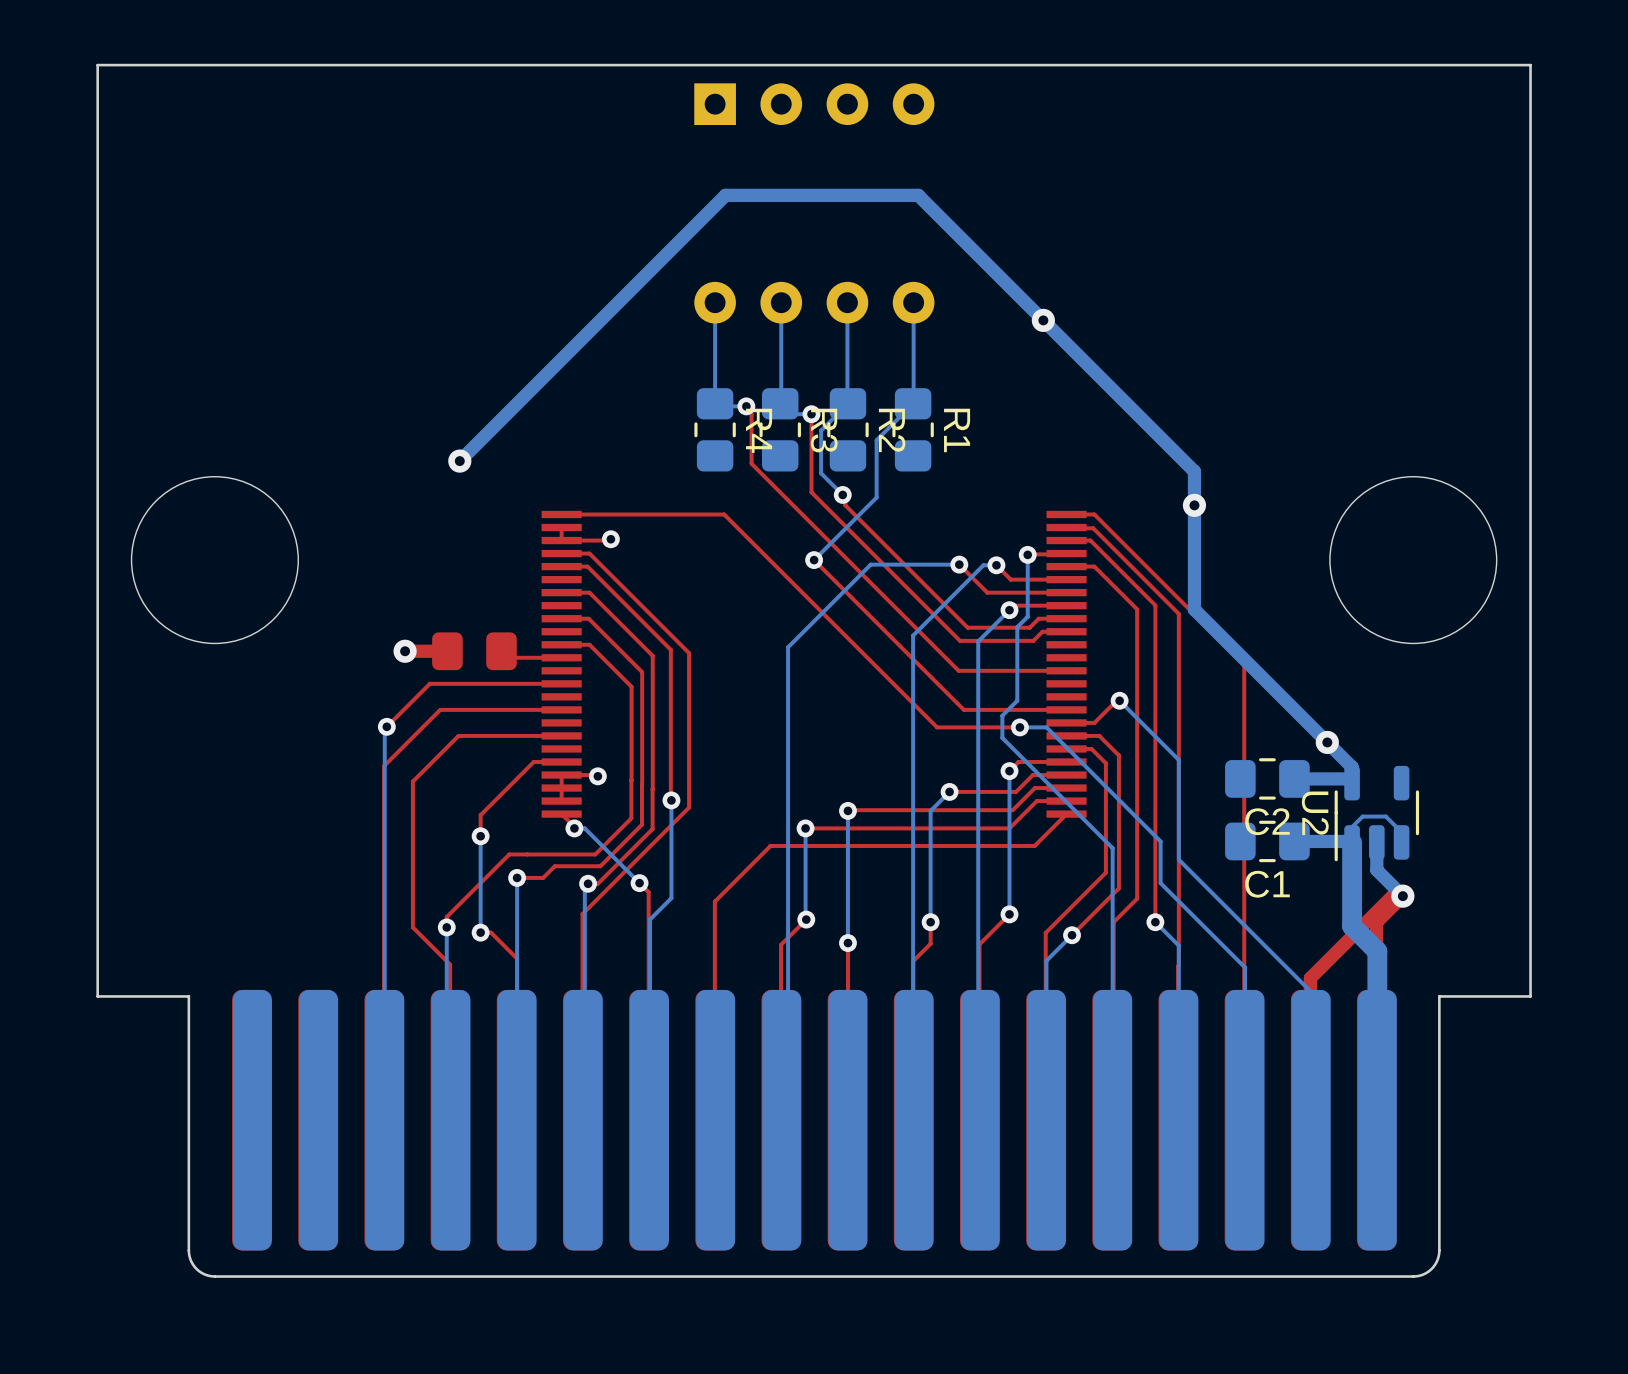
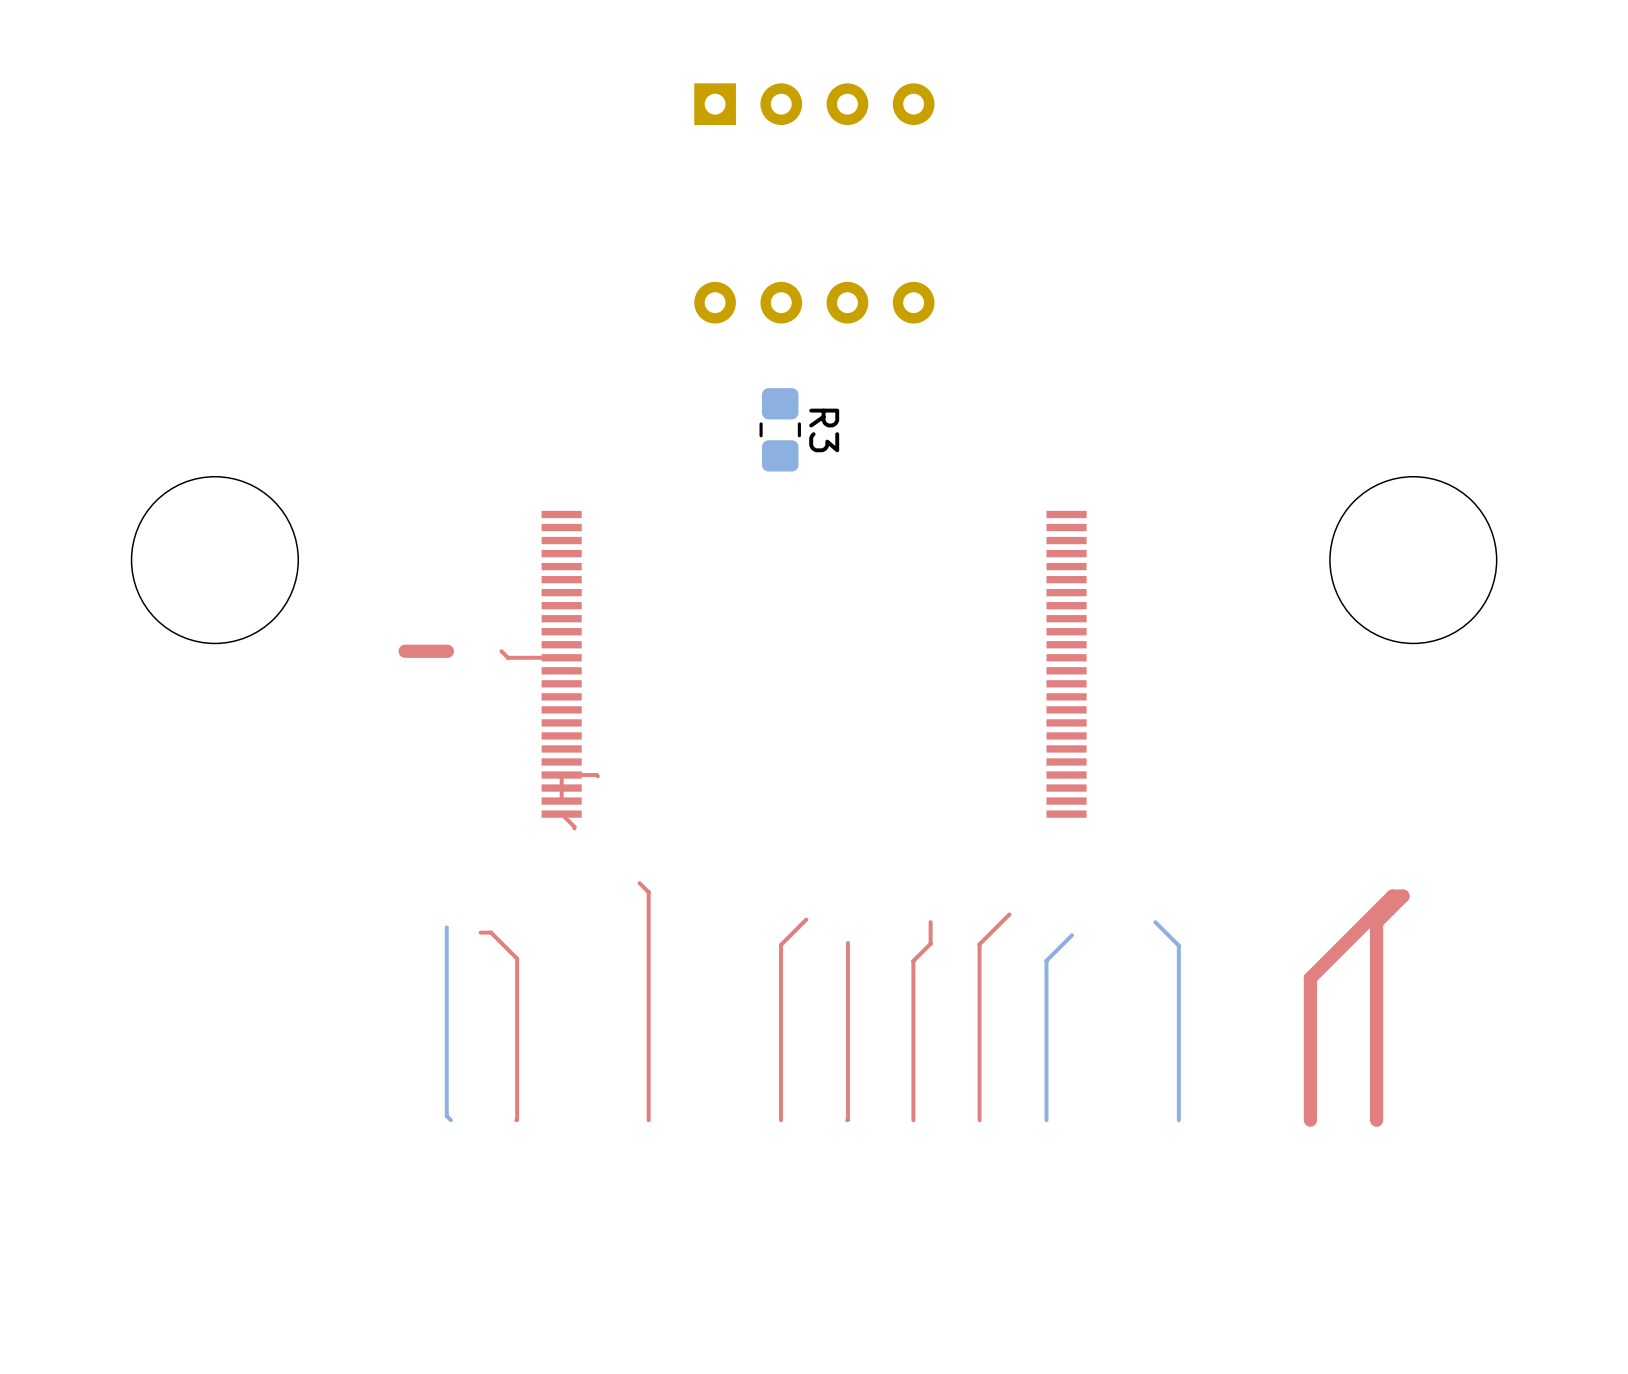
board edge: (1530, 65) (1530, 996) (1439, 996) (1439, 1250) (1436, 1261) (1431, 1268) (1421, 1275) (1413, 1276) (214, 1276) (206, 1275) (196, 1268) (191, 1261) (188, 1250) (188, 996) (97, 996) (97, 65) (1530, 65) -> none
bottom track: (715, 302) (715, 403) (717, 406) (746, 406) -> none
bottom track: (781, 302) (780, 403) (790, 414) (811, 414) -> none
bottom track: (847, 302) (847, 403) (821, 430) (821, 473) (842, 494) -> none
bottom track: (913, 302) (913, 403) (876, 440) (876, 497) (814, 560) -> none
via: (1043, 320) -> none
top track: (746, 406) (751, 414) (751, 463) (958, 670) (1066, 670) -> none
via: (746, 406) -> none
top track: (811, 414) (811, 492) (960, 640) (1033, 640) (1042, 631) (1066, 631) -> none
via: (811, 414) -> none
R4: (715, 429) -> none
R2: (847, 429) -> none
R1: (913, 429) -> none
bottom track: (459, 461) (725, 195) (918, 195) (1194, 471) (1194, 609) (1352, 767) (1352, 783) (1347, 778) (1294, 778) -> none
via: (459, 461) -> none
top track: (842, 494) (845, 497) (845, 505) (967, 627) (1029, 627) (1038, 618) (1066, 618) -> none
via: (842, 494) -> none
via: (1194, 505) -> none
top track: (561, 514) (724, 514) (937, 727) (1019, 727) -> none
top track: (1066, 514) (1094, 514) (1244, 664) (1244, 1120) -> none
top track: (561, 527) (561, 540) (610, 539) -> none
top track: (1066, 527) (1093, 528) (1178, 613) (1178, 1120) -> none
via: (610, 539) -> none
top track: (1066, 540) (1090, 540) (1155, 605) (1155, 922) -> none
top track: (561, 553) (589, 553) (689, 653) (689, 807) (582, 914) (582, 1120) -> none
bottom track: (1027, 554) (1027, 616) (1017, 627) (1017, 700) (1002, 715) (1002, 737) (1112, 848) (1112, 1120) -> none
via: (1027, 554) -> none
top track: (1045, 554) (1027, 554) -> none
top track: (814, 560) (963, 709) (1066, 709) -> none
via: (814, 560) -> none
top track: (959, 564) (987, 592) (1066, 592) -> none
bottom track: (959, 564) (870, 564) (788, 647) (788, 1113) (781, 1120) -> none
via: (959, 564) -> none
top track: (996, 565) (1010, 579) (1066, 579) -> none
bottom track: (996, 565) (983, 565) (913, 635) (914, 1120) -> none
via: (996, 565) -> none
top track: (561, 566) (587, 566) (670, 649) (671, 800) -> none
top track: (1066, 566) (1094, 566) (1137, 609) (1137, 898) (1113, 922) (1113, 1118) (1111, 1120) -> none
top track: (561, 592) (589, 592) (652, 655) (652, 789) -> none
top track: (1066, 605) (1013, 605) (1009, 610) -> none
bottom track: (1009, 610) (978, 641) (978, 1118) (980, 1120) -> none
via: (1009, 610) -> none
top track: (561, 618) (588, 618) (642, 672) (642, 784) -> none
top track: (561, 644) (589, 644) (631, 686) (631, 818) (595, 854) (509, 854) (446, 917) (446, 927) -> none
via: (405, 651) -> none
part: (474, 651) -> none
top track: (561, 683) (429, 683) (386, 726) -> none
top track: (1119, 700) (1116, 700) (1094, 722) (1066, 722) -> none
bottom track: (1119, 700) (1178, 759) (1178, 859) (1311, 992) (1311, 1120) -> none
via: (1119, 700) -> none
top track: (561, 709) (440, 709) (383, 766) (383, 1120) -> none
bottom track: (386, 726) (384, 728) (384, 1120) -> none
via: (386, 726) -> none
bottom track: (1019, 727) (1046, 727) (1160, 841) (1160, 883) (1245, 967) (1245, 1120) -> none
via: (1019, 727) -> none
top track: (561, 735) (458, 735) (412, 781) (412, 927) (450, 964) (450, 1120) -> none
top track: (1066, 735) (1099, 735) (1118, 755) (1118, 888) (1072, 935) -> none
via: (1327, 742) -> none
top track: (1066, 748) (1091, 748) (1105, 763) (1105, 872) (1045, 932) (1045, 1120) -> none
top track: (561, 761) (533, 761) (480, 815) (480, 836) -> none
top track: (1066, 761) (1018, 761) (1009, 771) -> none
bottom track: (1009, 771) (1009, 914) -> none
via: (1009, 771) -> none
top track: (1066, 775) (1032, 775) (1016, 791) (949, 791) -> none
via: (597, 776) -> none
C2: (1267, 778) -> none
top track: (641, 784) (641, 824) (600, 866) (554, 866) (543, 877) (517, 877) -> none
top track: (1066, 788) (1034, 788) (1012, 810) (847, 810) -> none
top track: (652, 789) (652, 829) (597, 883) (588, 883) -> none
bottom track: (949, 791) (930, 810) (930, 922) -> none
via: (949, 791) -> none
bottom track: (671, 800) (671, 898) (649, 919) (649, 1120) -> none
via: (671, 800) -> none
top track: (1066, 801) (1036, 801) (1009, 828) (805, 828) -> none
bottom track: (847, 810) (847, 943) -> none
via: (847, 810) -> none
U2: (1376, 813) -> none
top track: (1066, 814) (1034, 845) (770, 845) (714, 901) (714, 1120) -> none
bottom track: (574, 828) (584, 828) (639, 883) -> none
via: (574, 828) -> none
bottom track: (805, 828) (806, 919) -> none
via: (805, 828) -> none
bottom track: (480, 836) (480, 932) -> none
via: (480, 836) -> none
C1: (1267, 841) -> none
bottom track: (1294, 841) (1352, 842) -> none
bottom track: (1352, 842) (1352, 926) (1377, 951) (1377, 1120) -> none
bottom track: (1376, 842) (1376, 870) (1402, 896) -> none
bottom track: (1401, 842) (1401, 832) (1385, 816) (1362, 816) (1352, 827) (1352, 842) -> none
bottom track: (517, 877) (517, 1120) -> none
via: (517, 877) -> none
bottom track: (588, 883) (584, 887) (584, 1118) (583, 1120) -> none
via: (588, 883) -> none
via: (639, 883) -> none
via: (1402, 896) -> none
via: (1009, 914) -> none
via: (806, 919) -> none
via: (930, 922) -> none
via: (1155, 922) -> none
via: (446, 927) -> none
via: (480, 932) -> none
via: (1072, 935) -> none
via: (847, 943) -> none
part: (814, 1120) -> none

